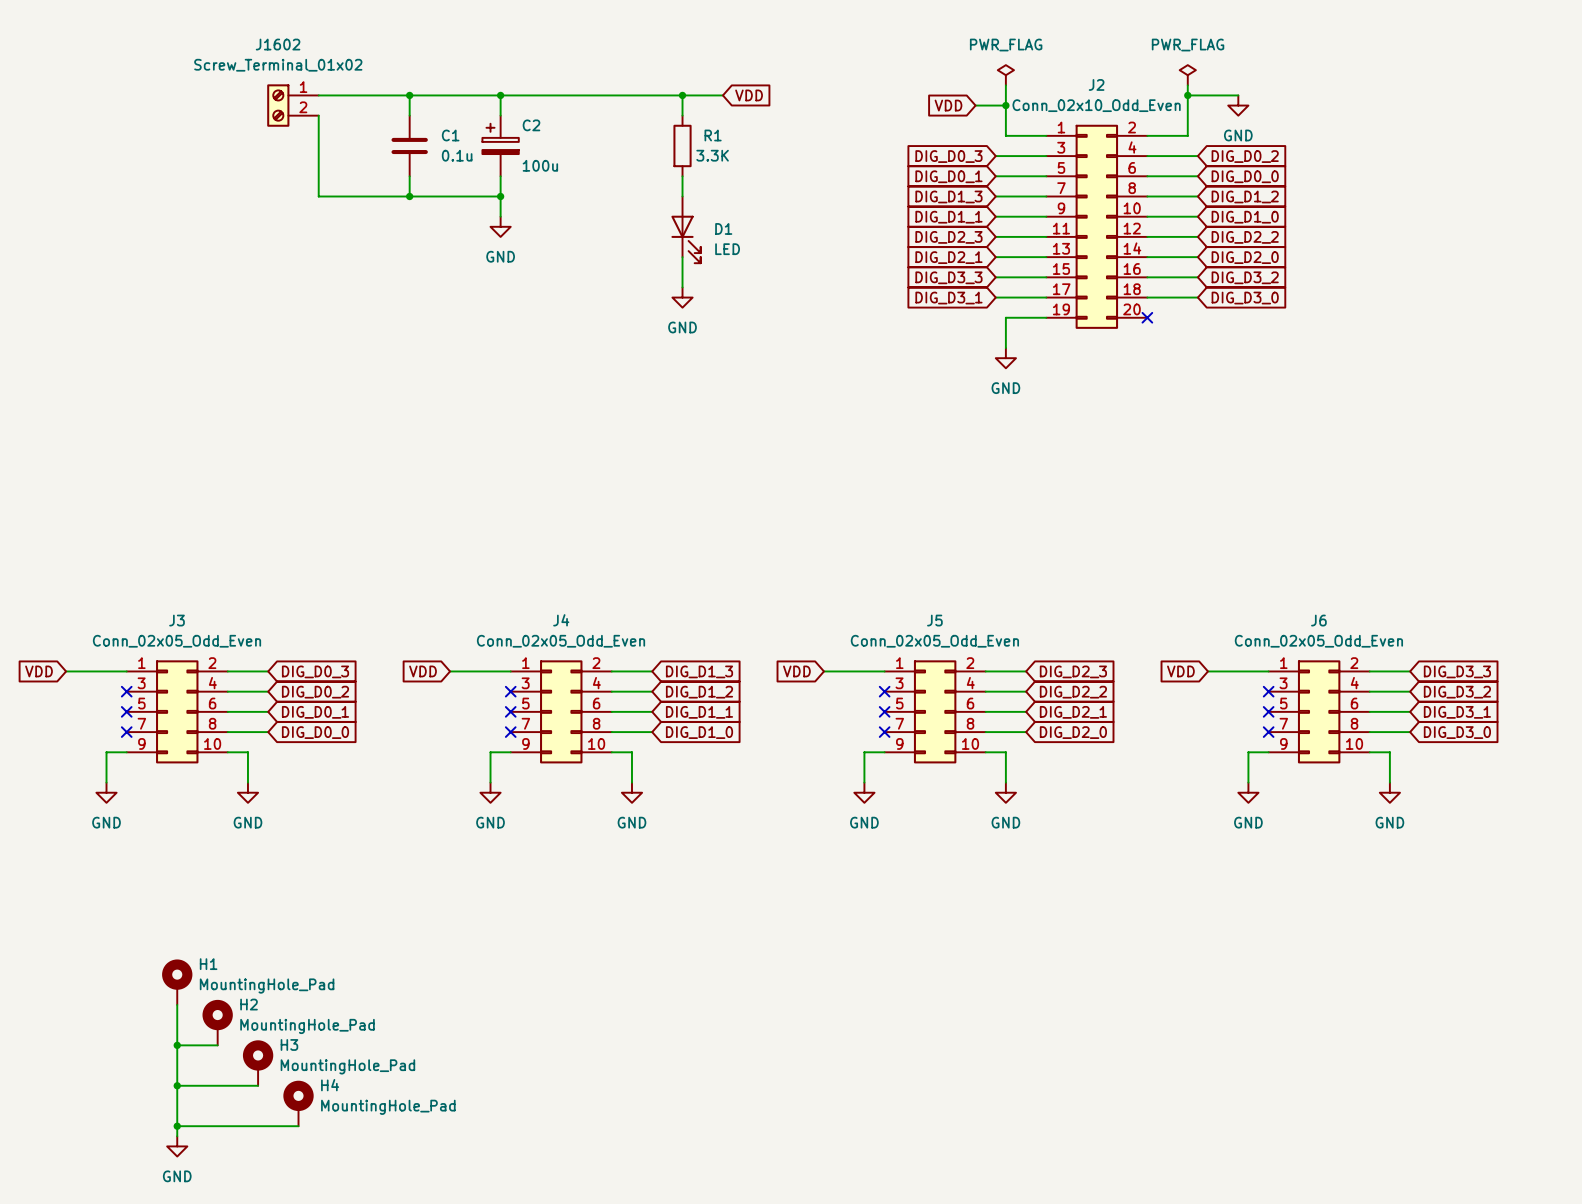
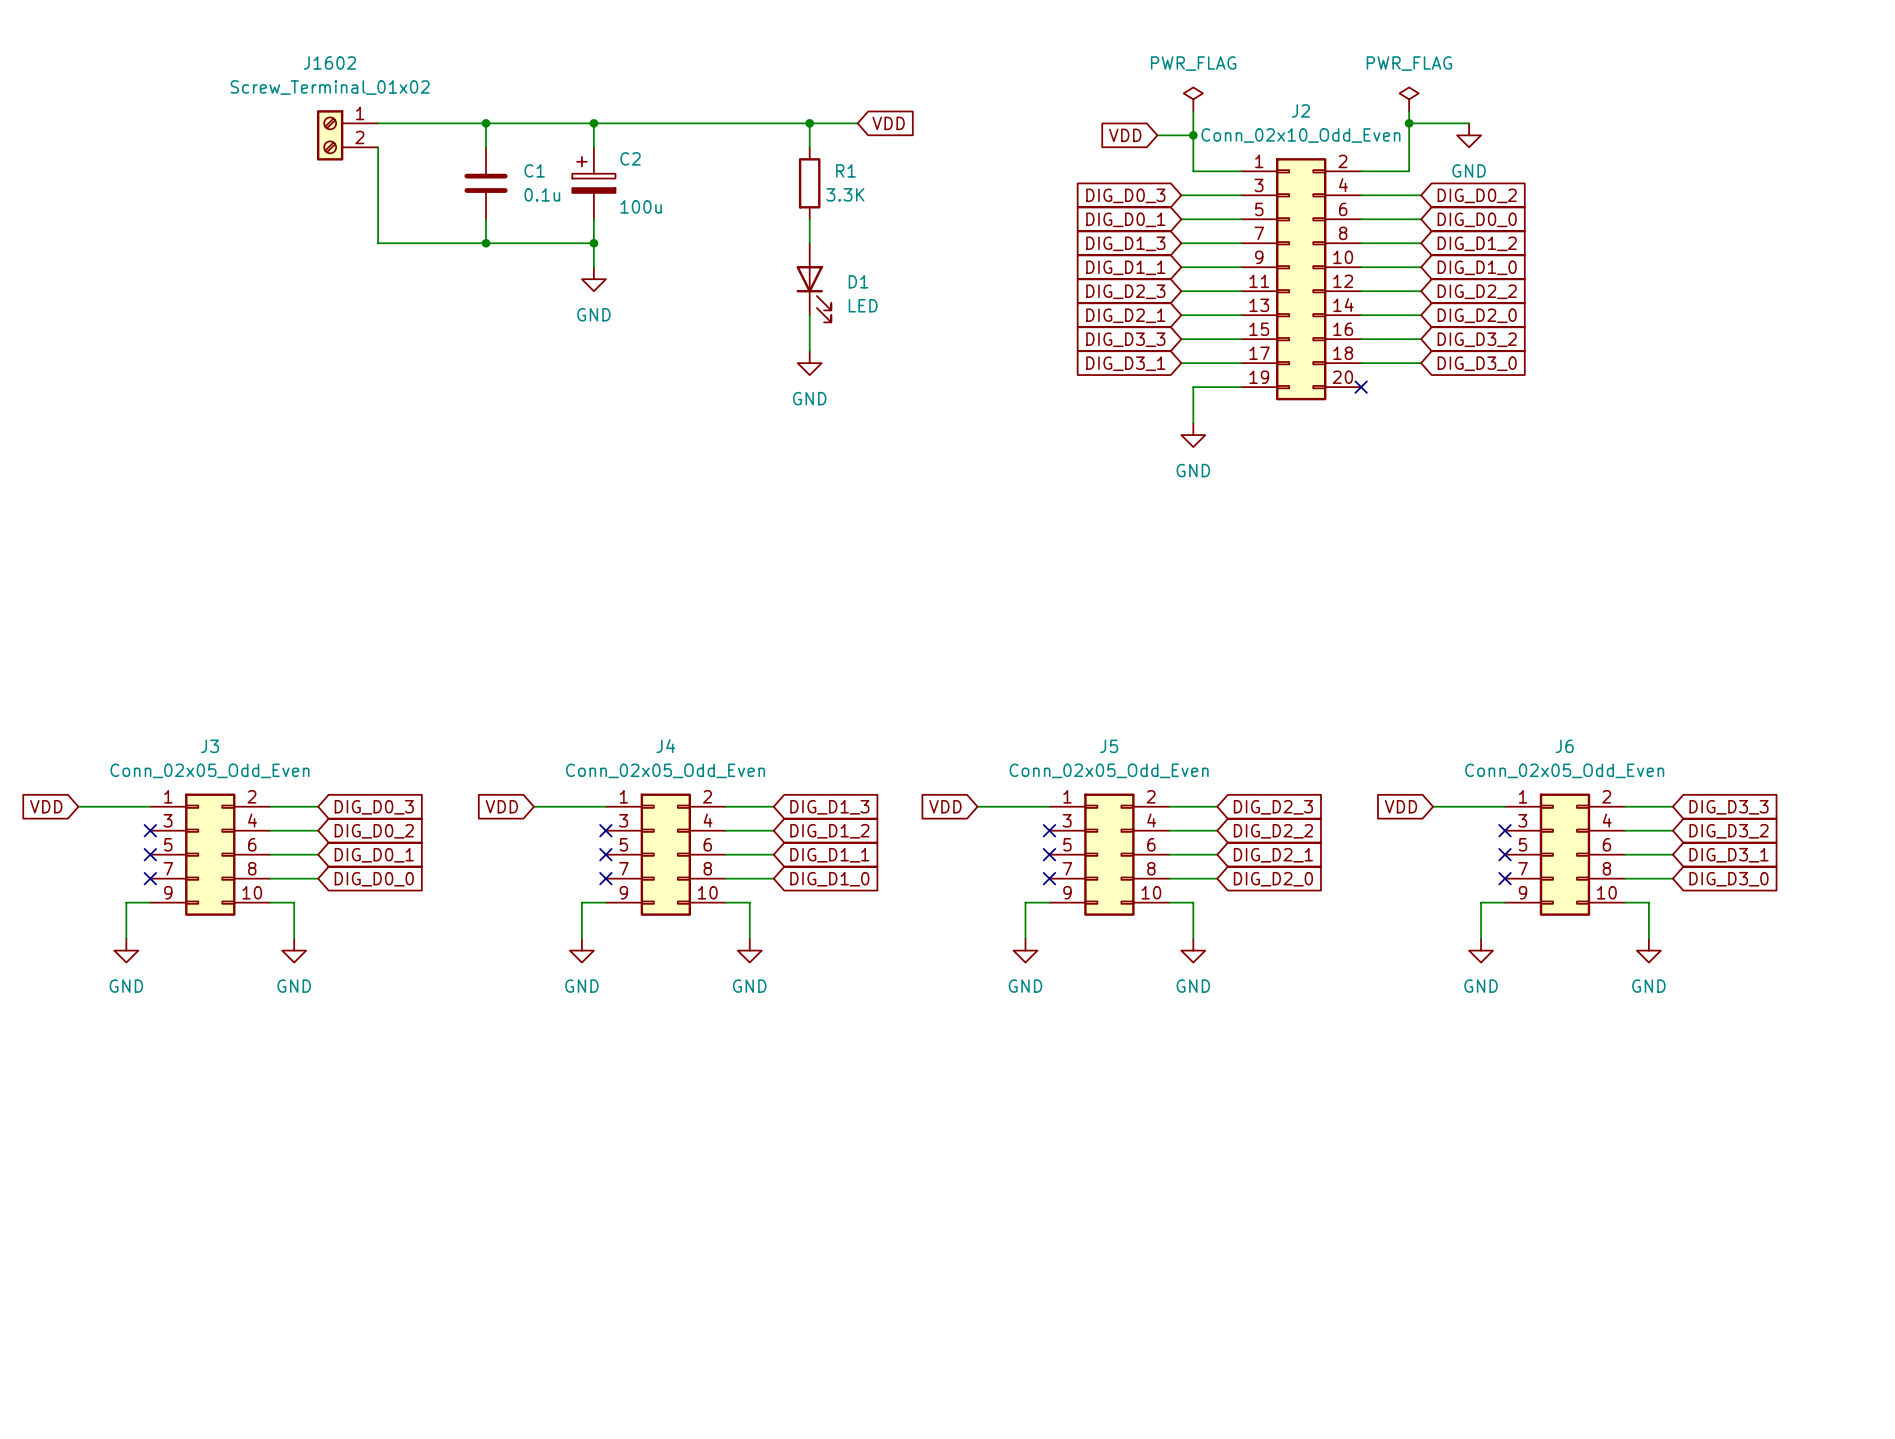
H1: MountingHole_Pad (177, 982) -> none
wire: (177, 1004) (177, 1136) -> none
H2: MountingHole_Pad (217, 1022) -> none
wire: (177, 1045) (217, 1045) -> none
junction: (177, 1045) -> none
H3: MountingHole_Pad (258, 1063) -> none
wire: (177, 1085) (258, 1085) -> none
junction: (177, 1085) -> none
H4: MountingHole_Pad (298, 1103) -> none
wire: (177, 1126) (298, 1126) -> none
junction: (177, 1126) -> none
power symbol: GND (177, 1146) -> none

